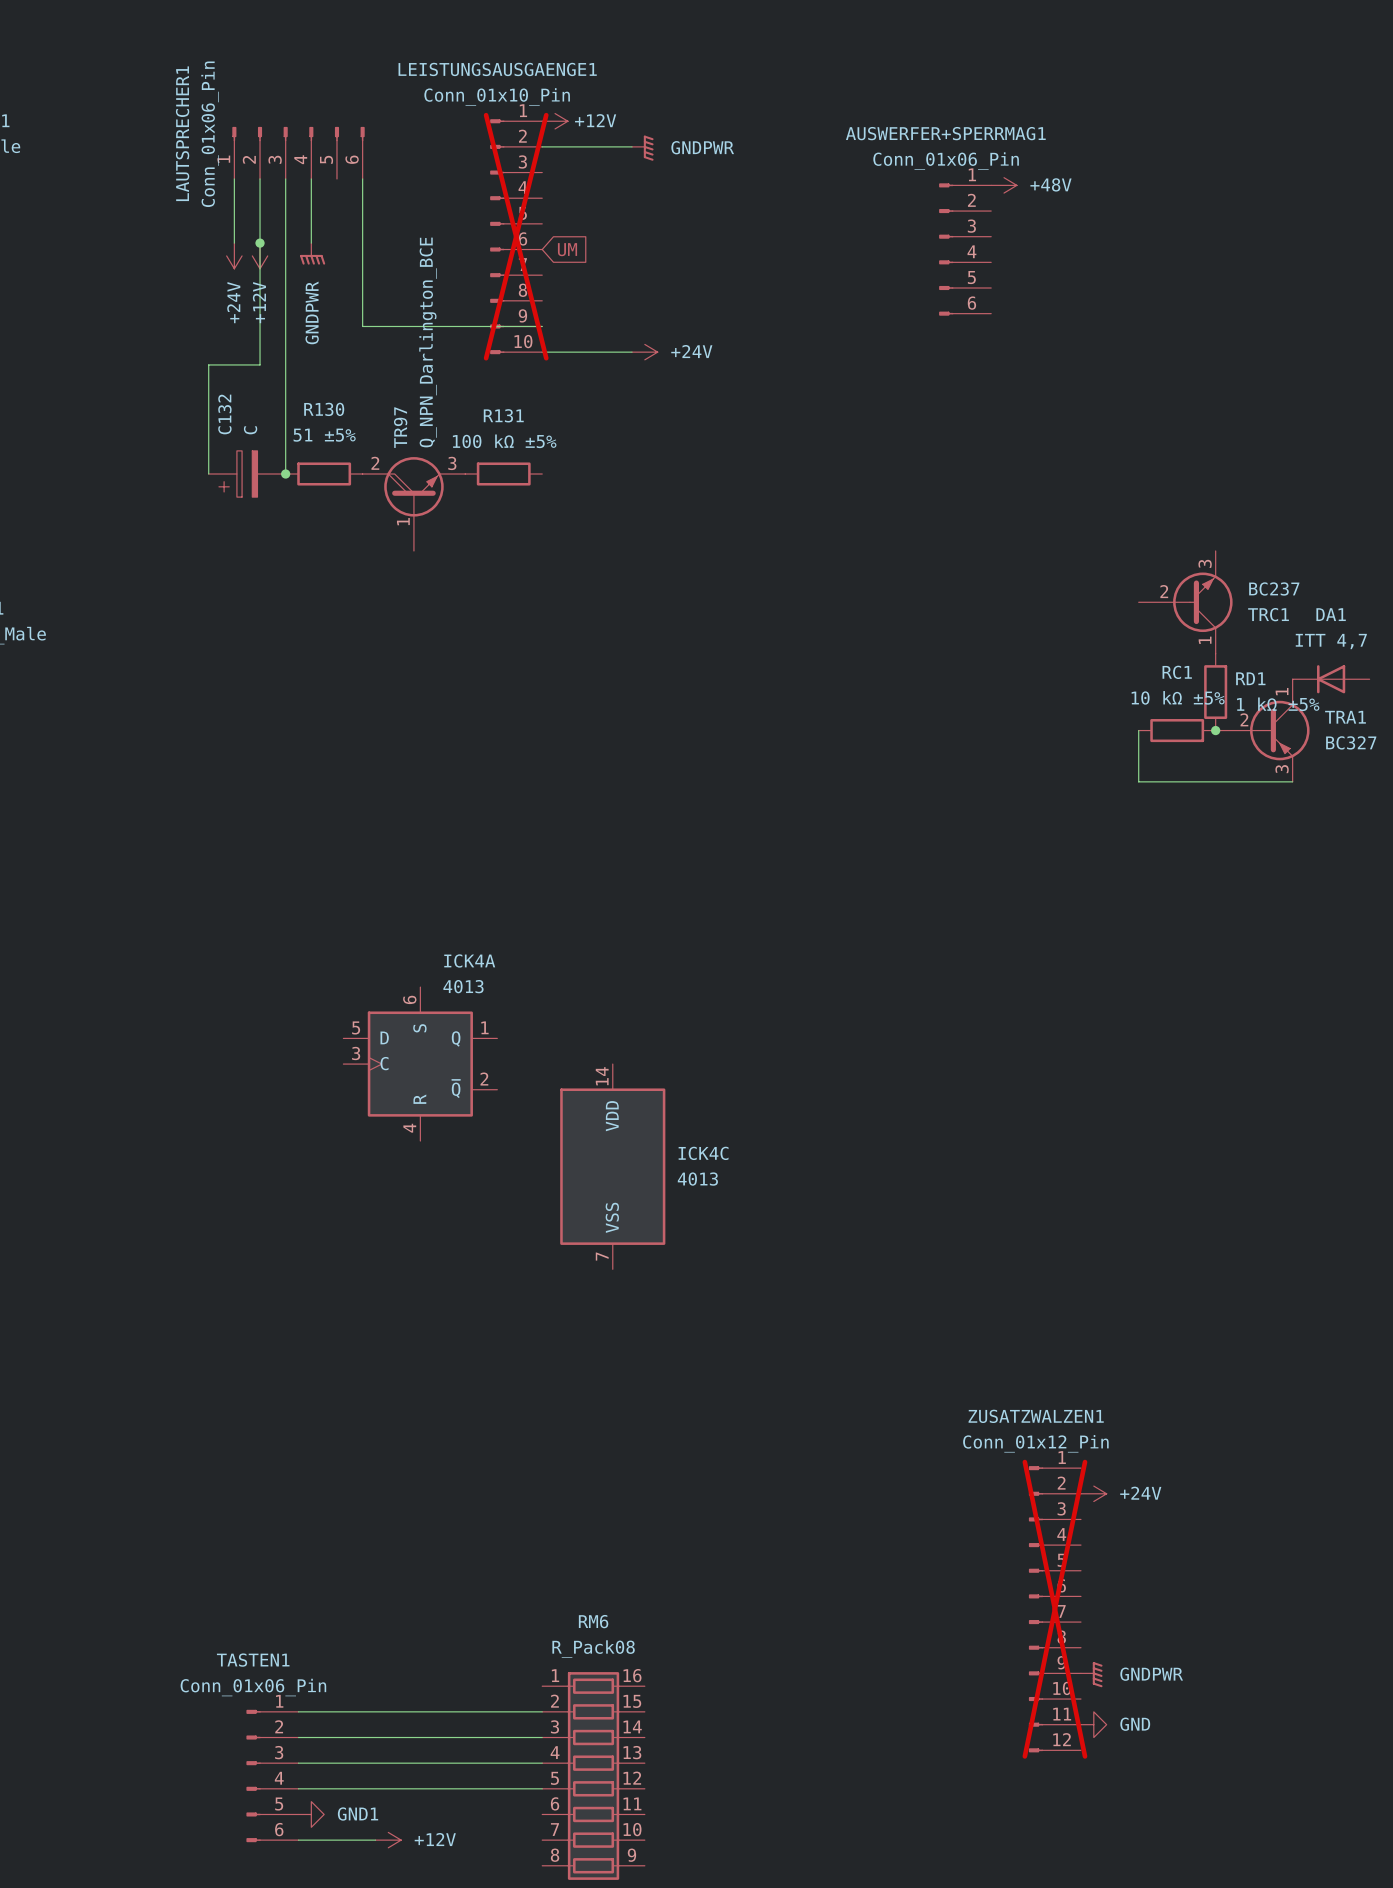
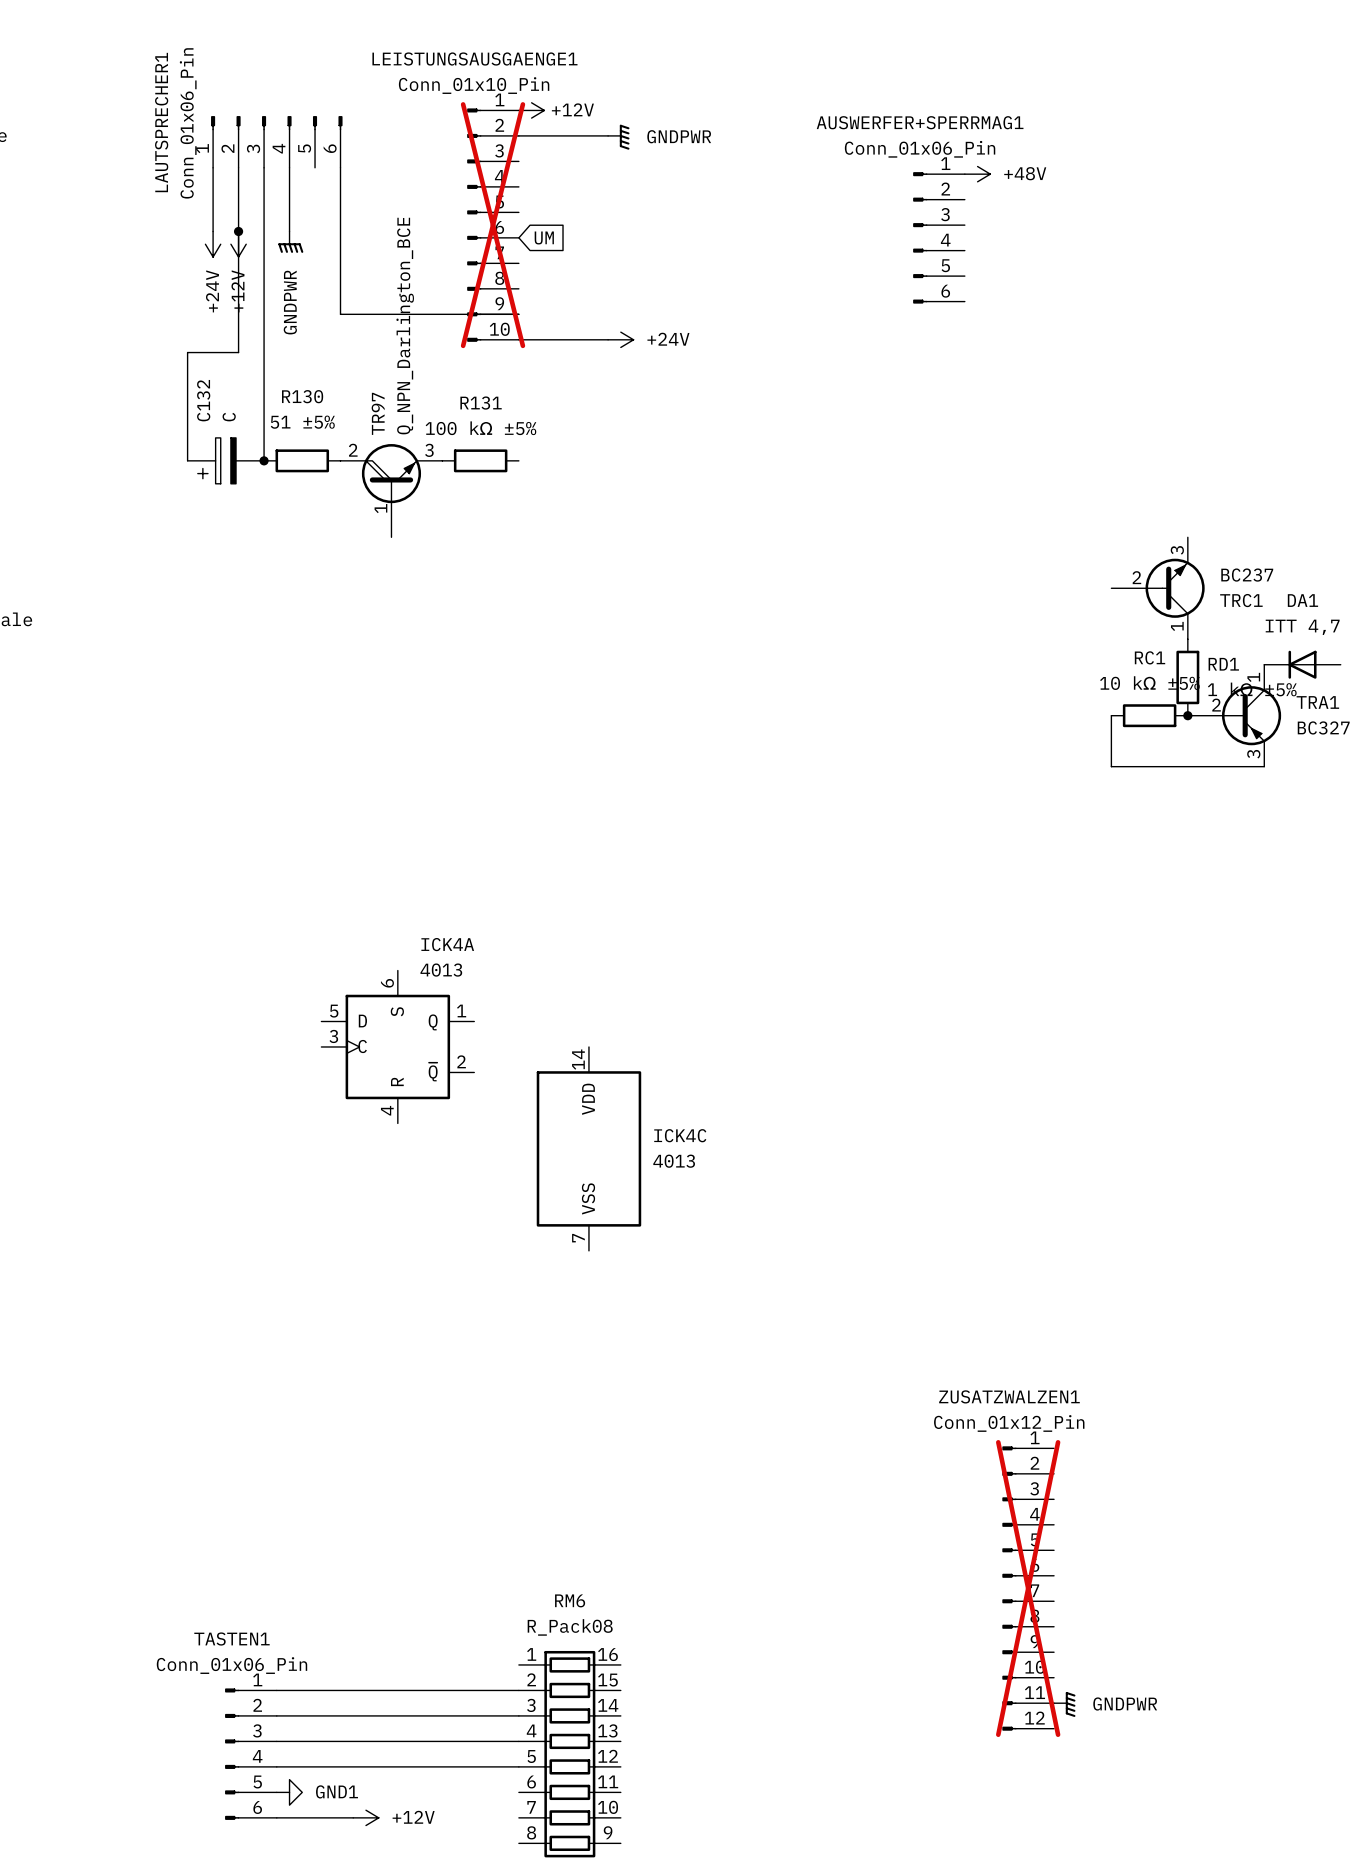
power symbol: +24V (1093, 1493) -> none
power symbol: GNDPWR (1091, 1674) -> none
power symbol: GND (1093, 1724) -> GNDPWR (1064, 1704)

